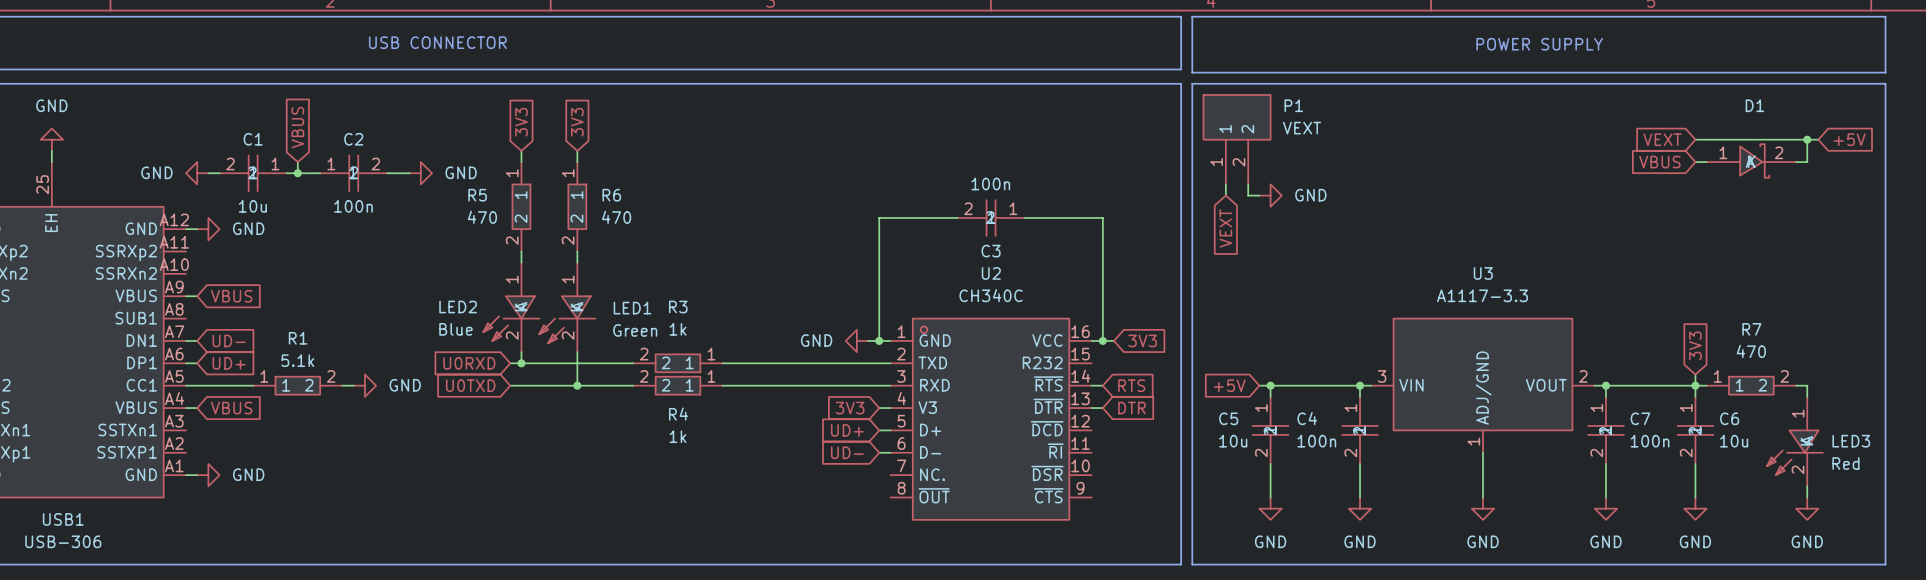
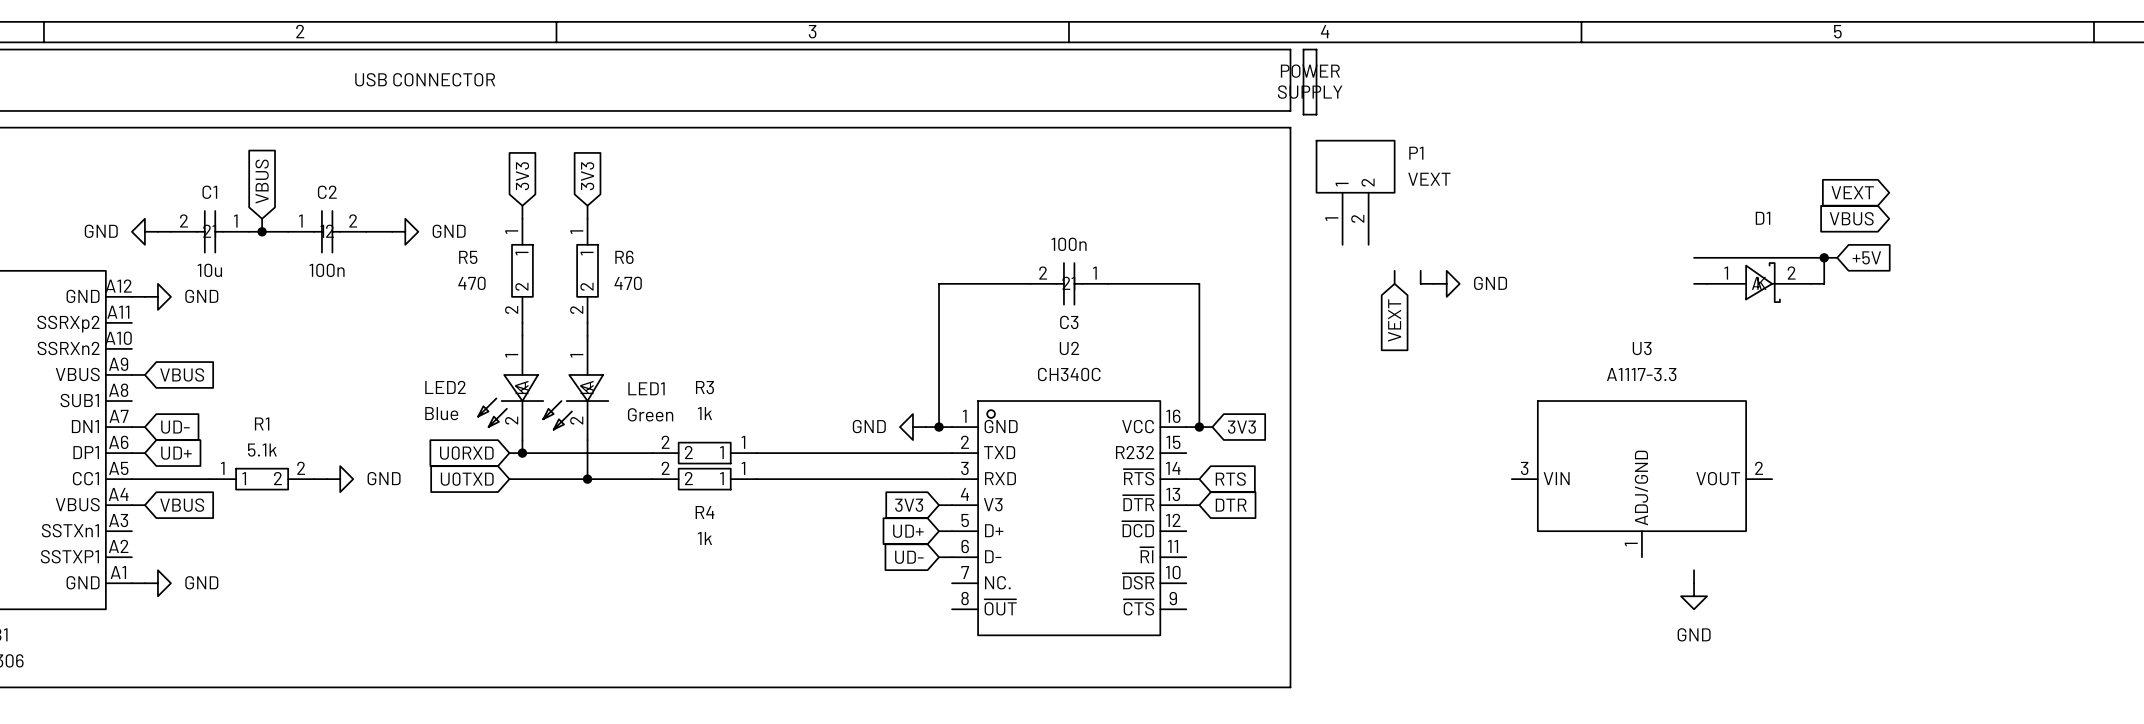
line: (1203, 16) (1885, 16) (1885, 72) (1203, 72) -> (1316, 49) (1316, 114)
text: none -> POWER (1310, 71)
text: POWER SUPPLY (1539, 44) -> none
text: none -> SUPPLY (1310, 92)
line: (1192, 83) (1885, 83) (1885, 564) (1192, 564) (1192, 83) -> none
wire: (1695, 139) (1818, 139) -> (1694, 257) (1837, 257)
wire: (1807, 139) (1807, 162) (1796, 162) -> (1824, 257) (1824, 283) (1811, 283)
junction: (1807, 139) -> none
global label position: +5V (1849, 139) -> +5V (1866, 257)
D1 position: (1751, 160) -> (1759, 282)
wire: (1695, 162) (1706, 162) -> (1694, 283) (1707, 283)
wire: (1225, 184) (1225, 195) -> (1394, 270) (1394, 283)
wire: (1248, 184) (1248, 195) (1259, 195) -> (1420, 270) (1420, 283) (1433, 283)
power symbol position: GND (1270, 195) -> GND (1446, 283)
junction: none -> (1824, 257)
global label position: VEXT (1225, 228) -> VEXT (1394, 320)
global label: 3V3 (1695, 345) -> none
wire: (1695, 374) (1695, 396) -> none
global label: +5V (1229, 385) -> none
wire: (1259, 385) (1371, 385) -> none
wire: (1270, 385) (1270, 396) -> none
junction: (1270, 385) -> none
wire: (1360, 385) (1360, 396) -> none
junction: (1360, 385) -> none
wire: (1594, 385) (1706, 385) -> none
wire: (1606, 385) (1606, 396) -> (1694, 570) (1694, 583)
junction: (1606, 385) -> none
junction: (1695, 385) -> none
R7: 470 (1751, 385) -> none
wire: (1796, 385) (1807, 385) (1807, 396) -> none
C5: 10u (1270, 430) -> none
C4: 100n (1360, 430) -> none
C7: 100n (1606, 430) -> none
C6: 10u (1695, 430) -> none
LED3: Red (1794, 441) -> none
wire: (1483, 452) (1483, 497) -> none
wire: (1270, 463) (1270, 497) -> none
wire: (1360, 463) (1360, 497) -> none
wire: (1606, 463) (1606, 497) -> none
wire: (1695, 463) (1695, 497) -> none
power symbol: none -> GND (1694, 596)
wire: (1807, 486) (1807, 497) -> none
power symbol: GND (1270, 508) -> none
power symbol: GND (1360, 508) -> none
power symbol: GND (1483, 508) -> none
power symbol: GND (1606, 508) -> none
power symbol: GND (1695, 508) -> none
power symbol: GND (1807, 508) -> none

